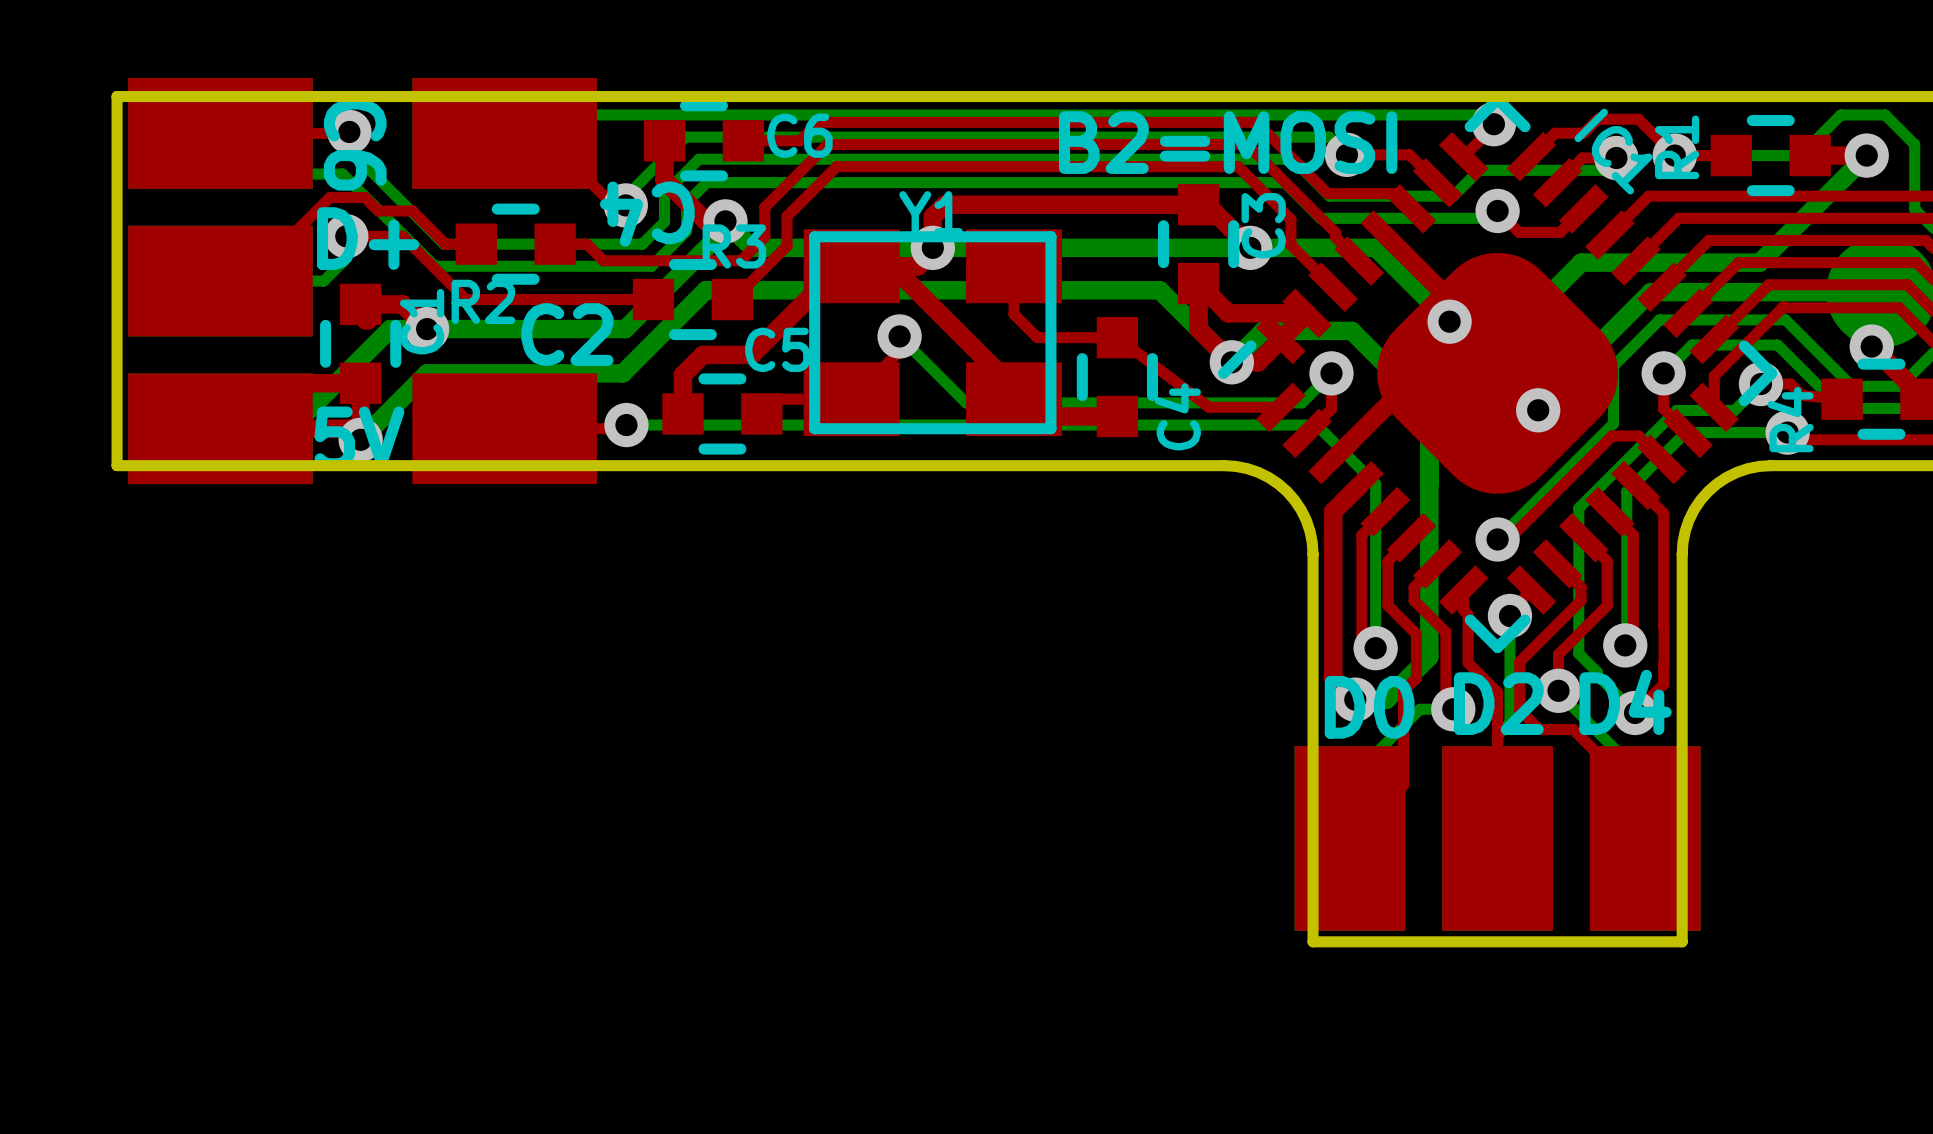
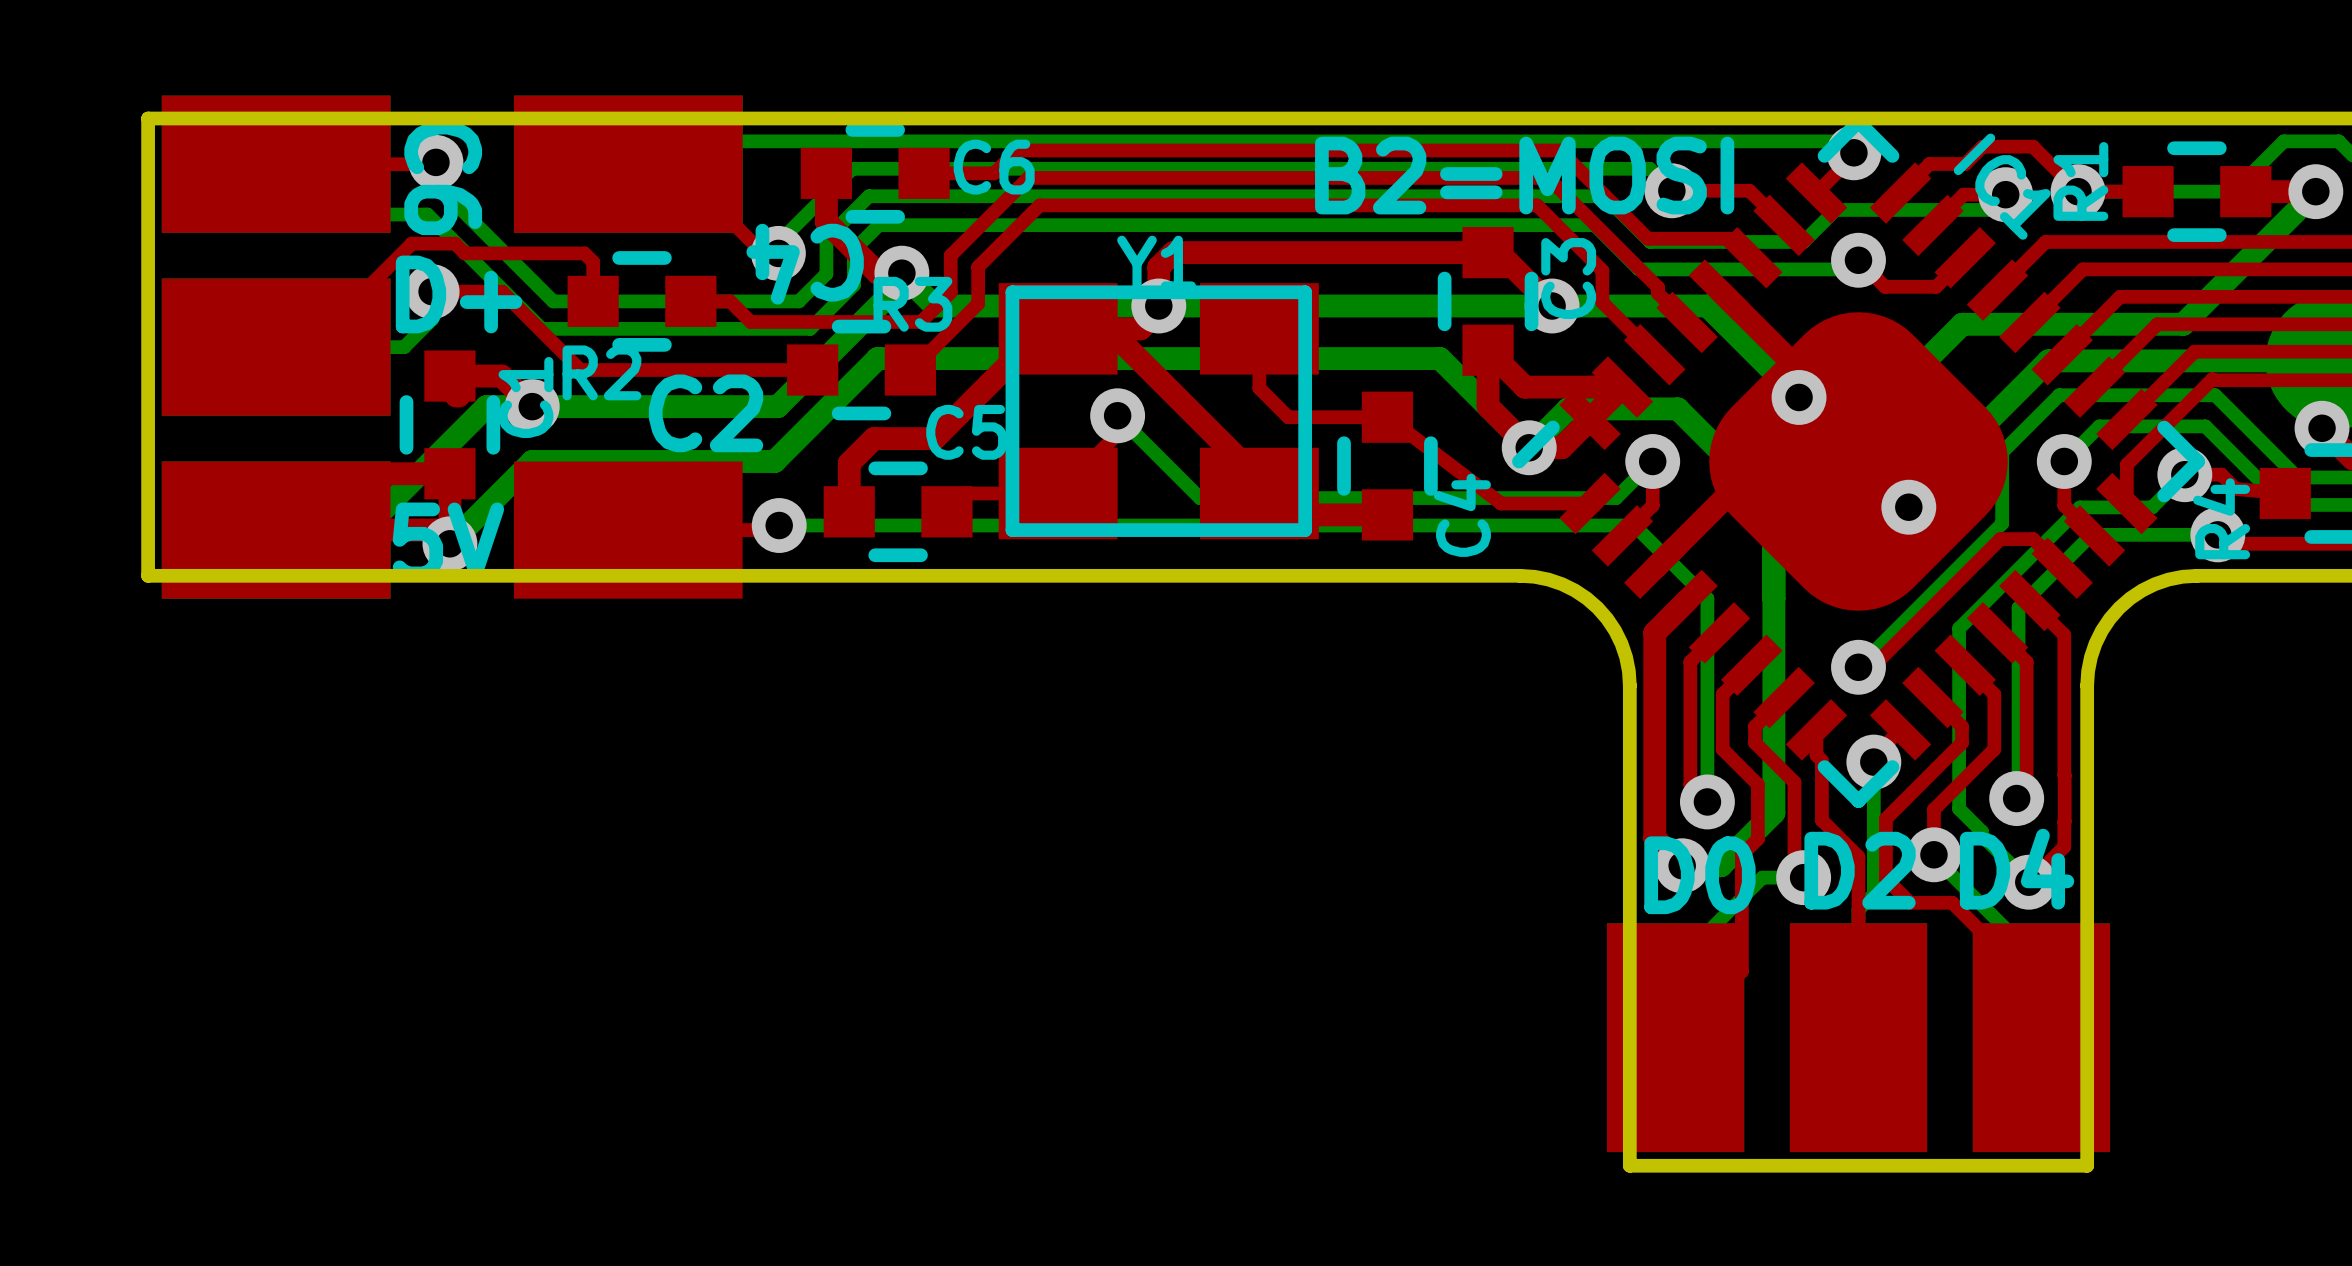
top track: (372, 205) (378, 210) (412, 210) (445, 244) (476, 244) -> (464, 253) (584, 253) (593, 262) (593, 301)

